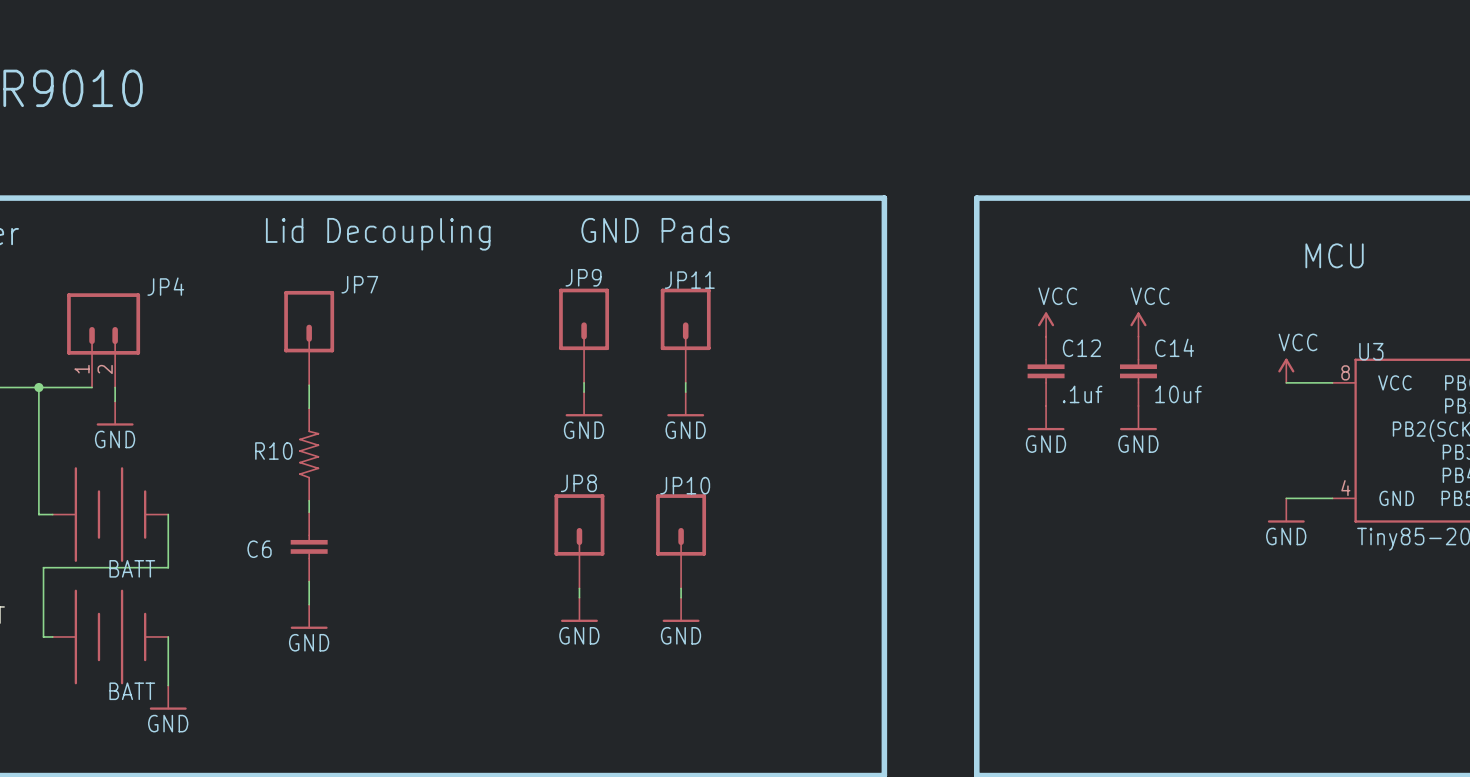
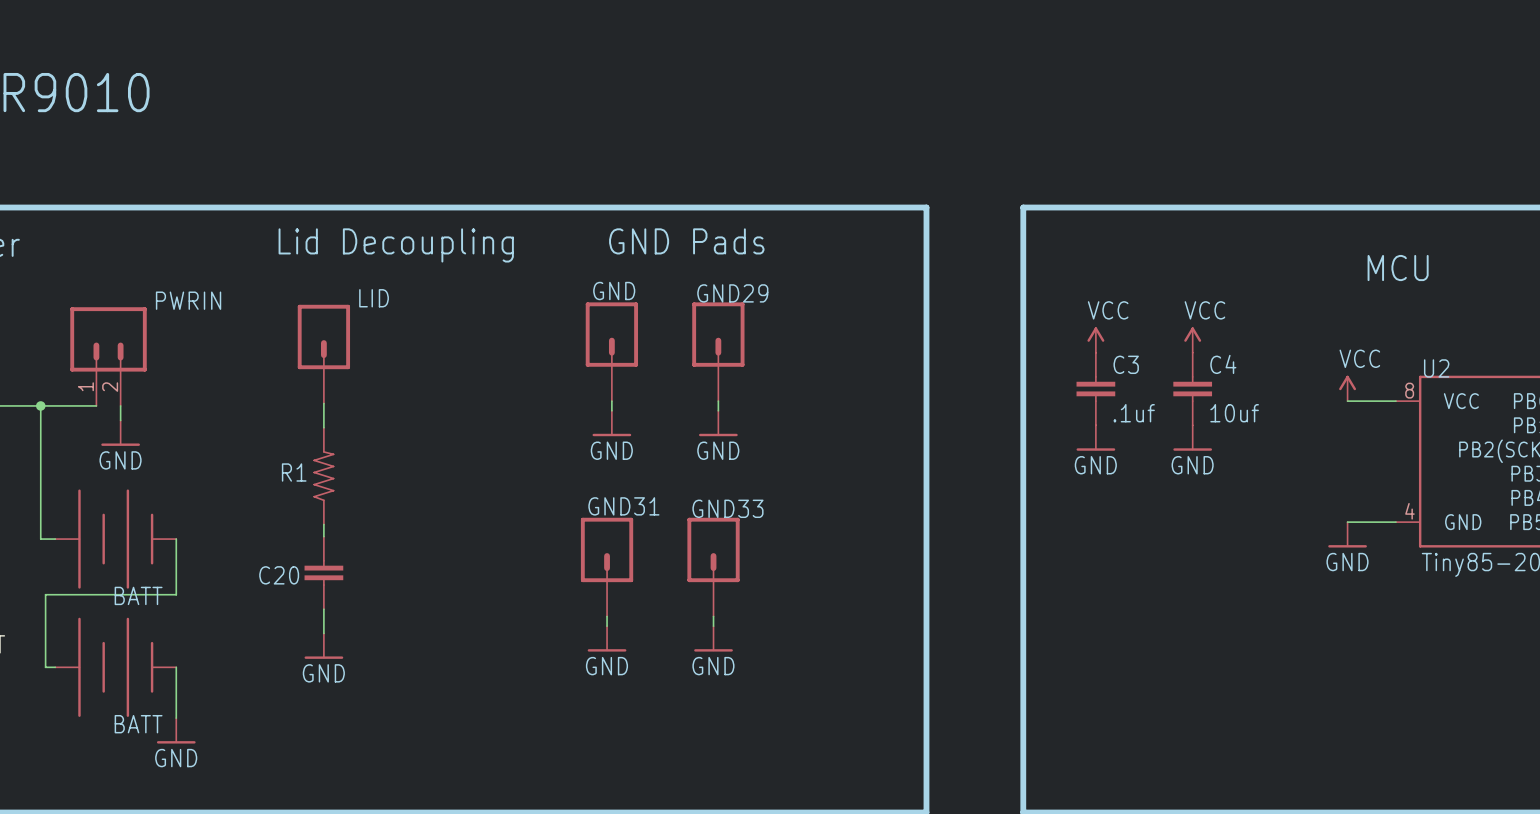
JP9 name: JP9 (583, 277) -> GND (614, 291)
JP11 name: JP11 (689, 280) -> GND29 (732, 293)
JP7 name: JP7 (359, 284) -> LID (374, 298)
JP4 name: JP4 (165, 286) -> PWRIN (188, 300)
C14 name: C14 (1174, 347) -> C4 (1223, 364)
C12 name: C12 (1081, 348) -> C3 (1126, 364)
U3 name: U3 (1371, 351) -> U2 (1436, 368)
R10 name: R10 (273, 451) -> R1 (294, 472)
JP8 name: JP8 (578, 483) -> GND31 (623, 506)
JP10 name: JP10 (685, 485) -> GND33 (727, 508)
C6 name: C6 (259, 549) -> C20 (279, 575)

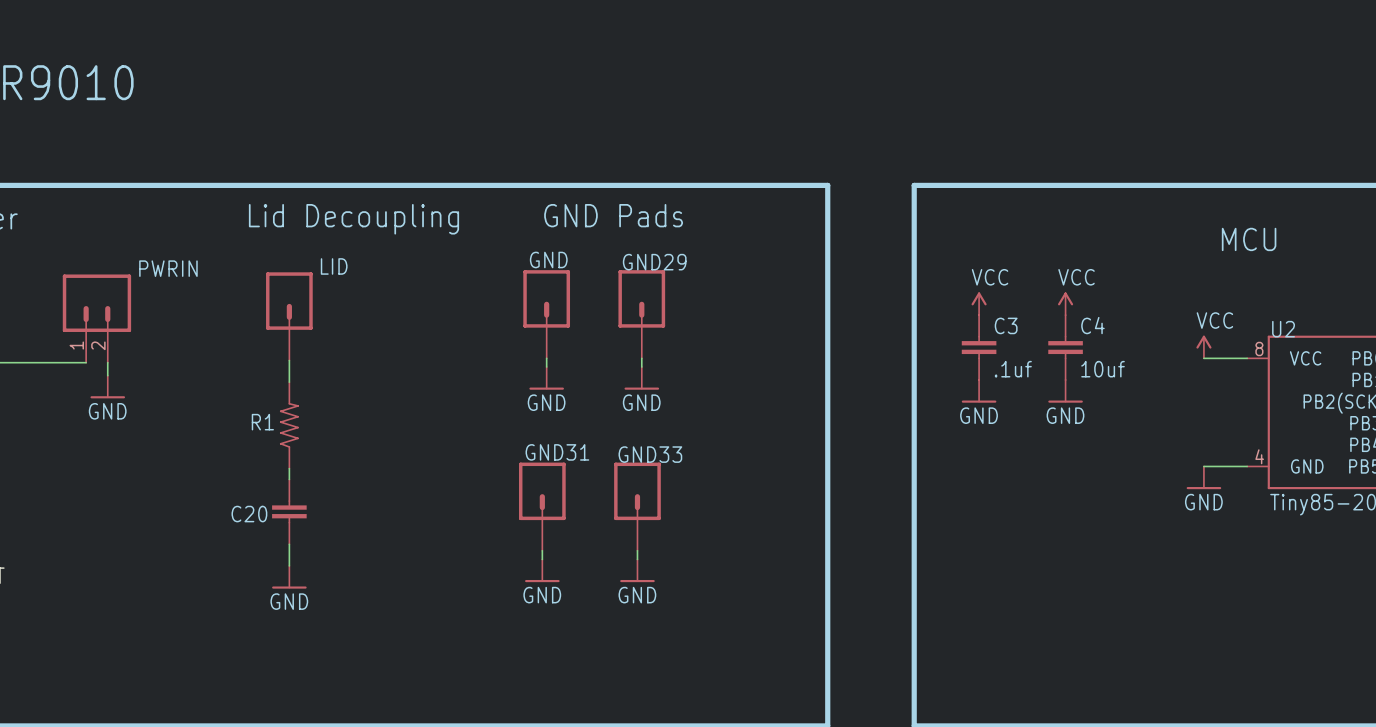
wire: (40, 405) (40, 539) (55, 539) -> none
junction: (40, 405) -> none
part: (115, 539) -> none
wire: (176, 539) (176, 594) (45, 594) (45, 667) (55, 667) -> none
part: (115, 667) -> none
wire: (176, 667) (176, 718) -> none
power symbol: GND (176, 730) -> none

